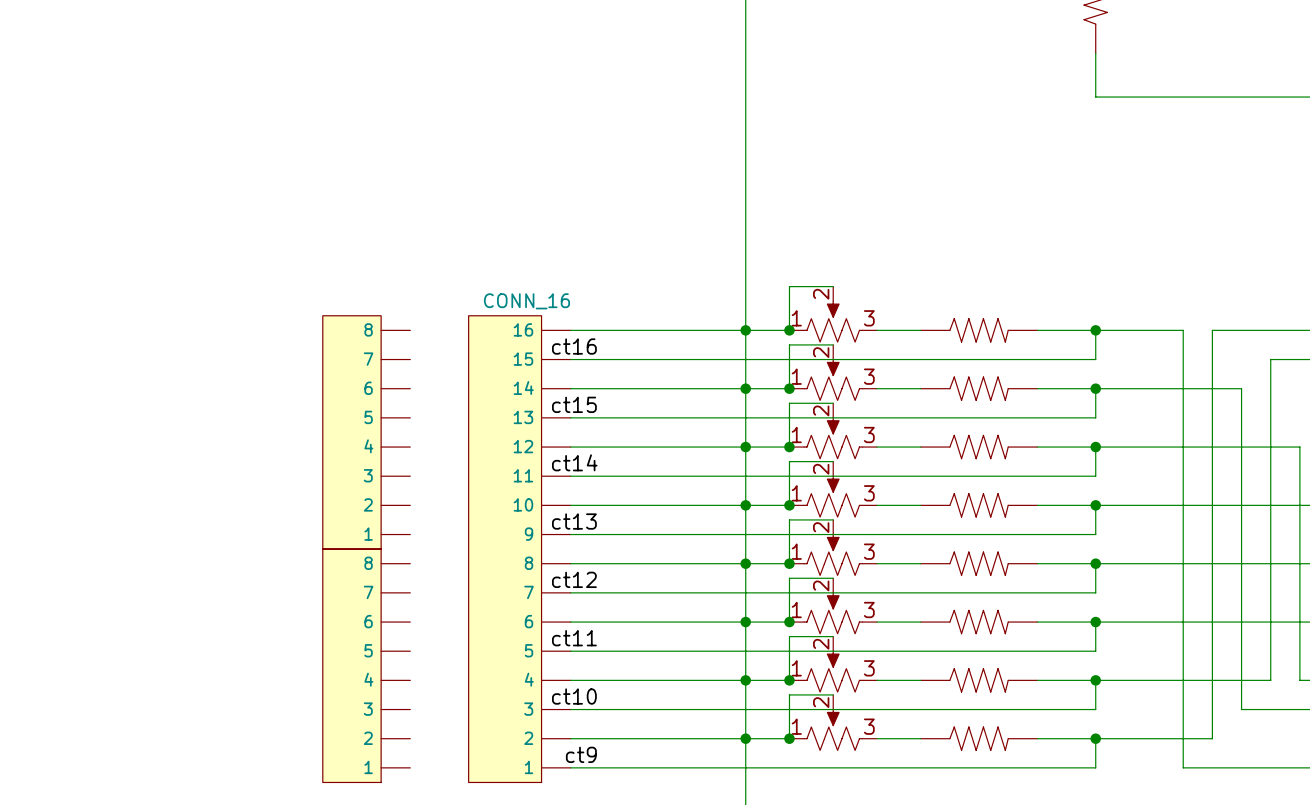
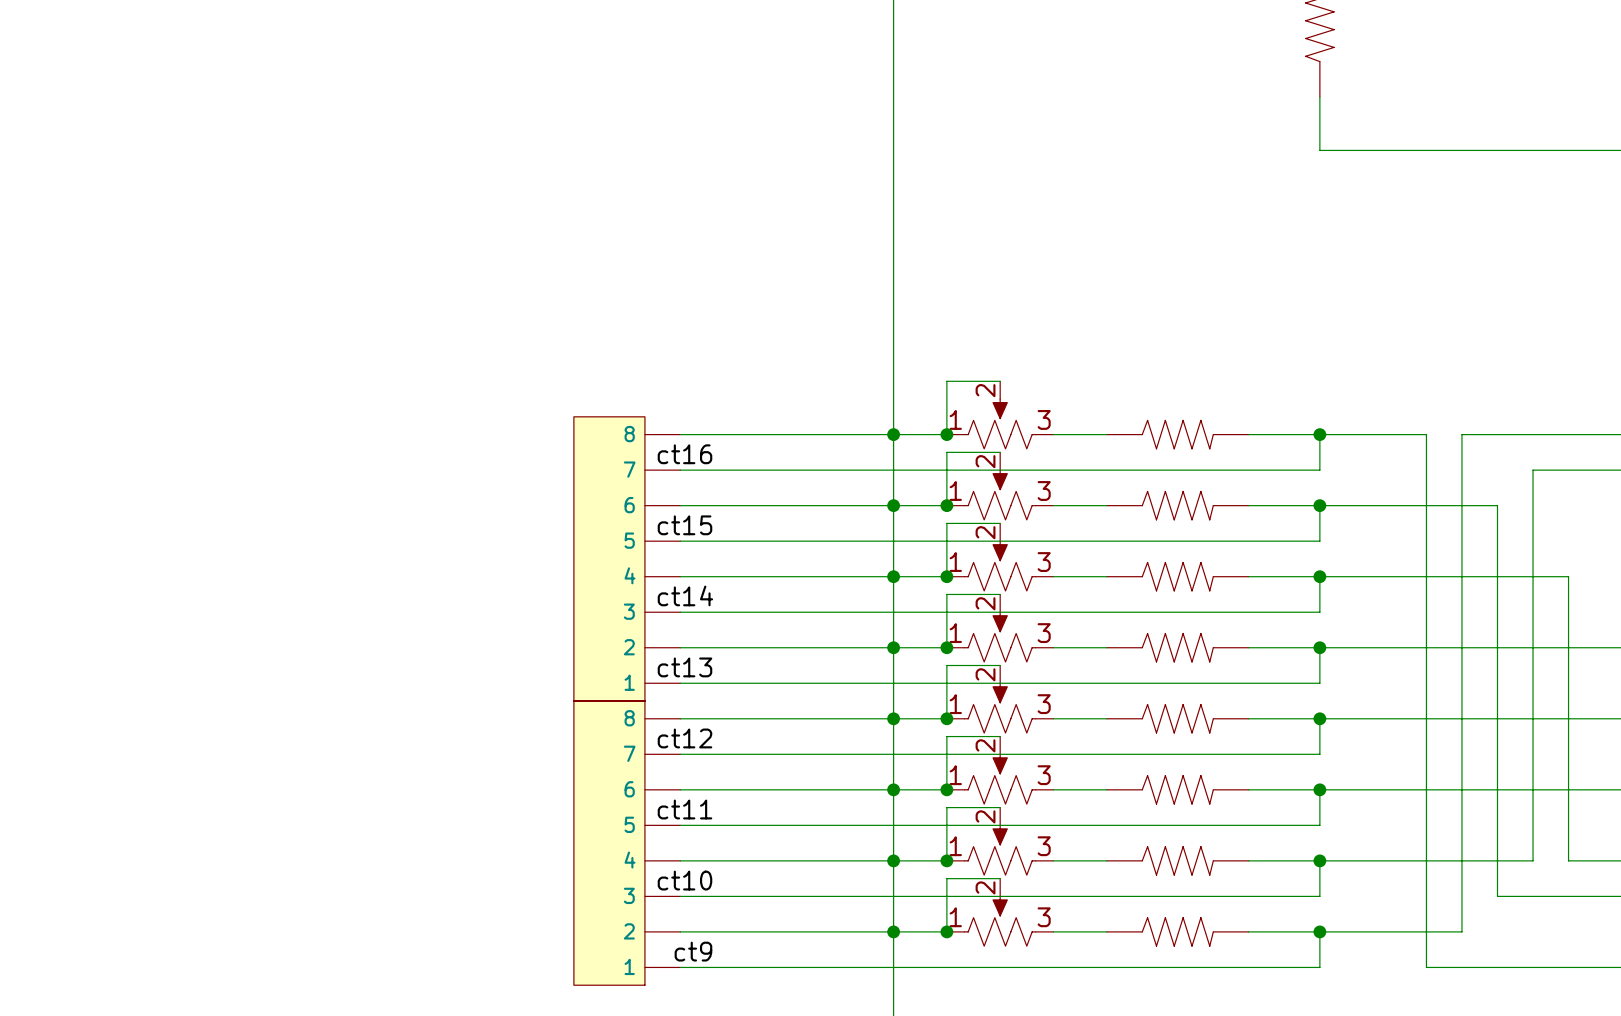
part: (366, 432) -> none
part: none -> (627, 558)
part: CONN_16 (519, 549) -> none
part: (366, 665) -> none
part: none -> (627, 843)

